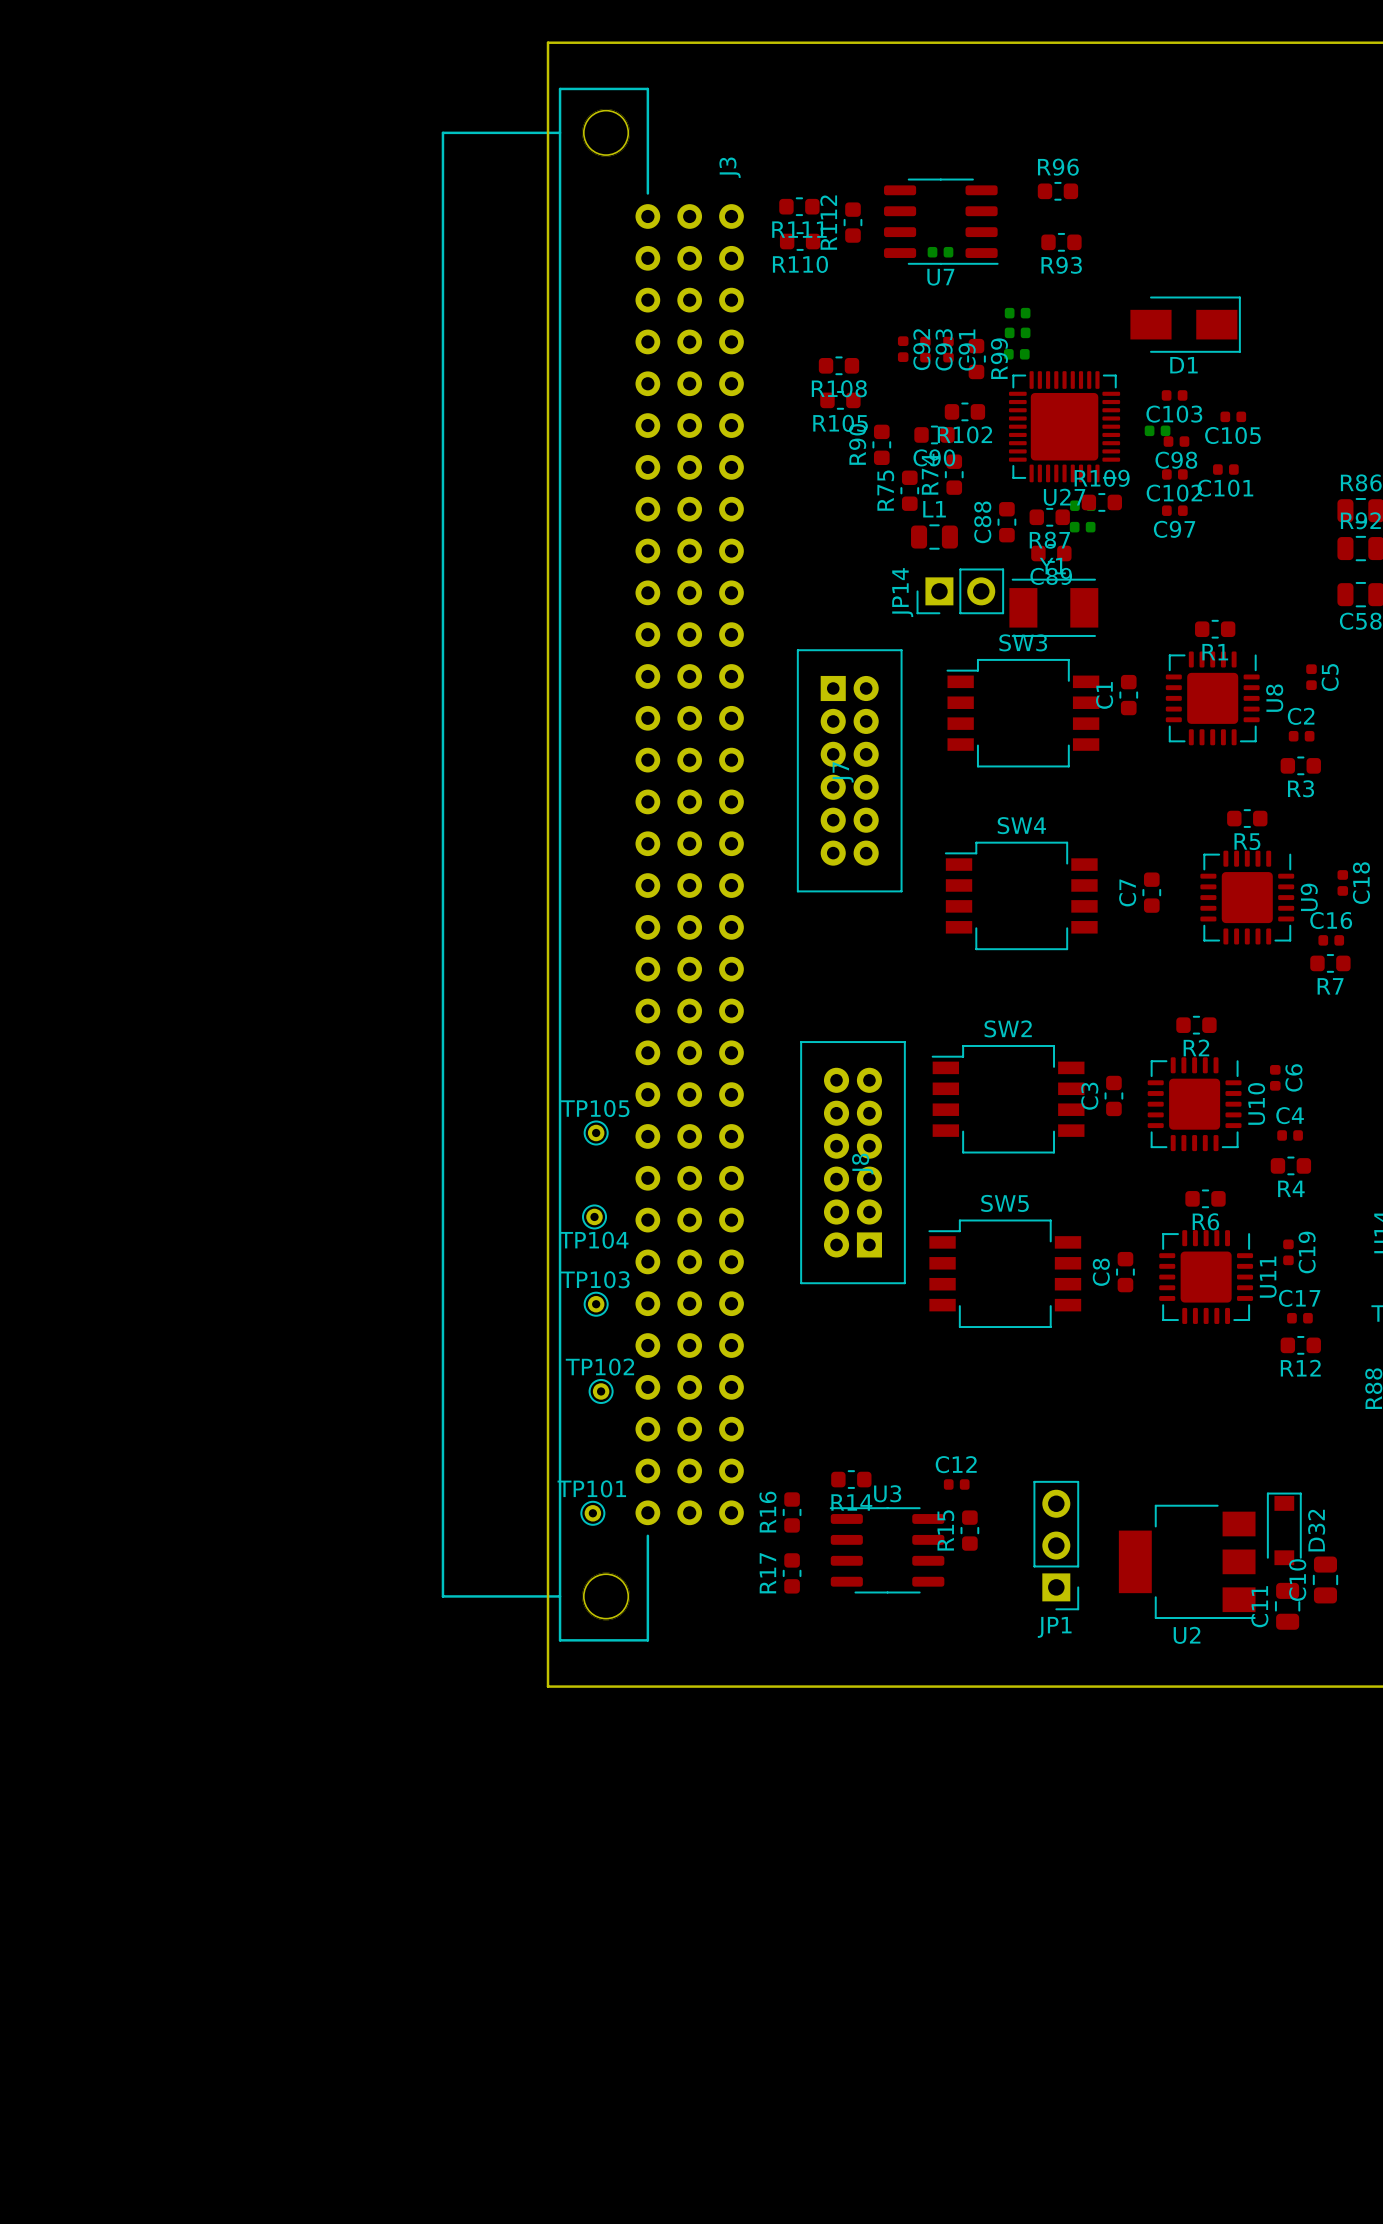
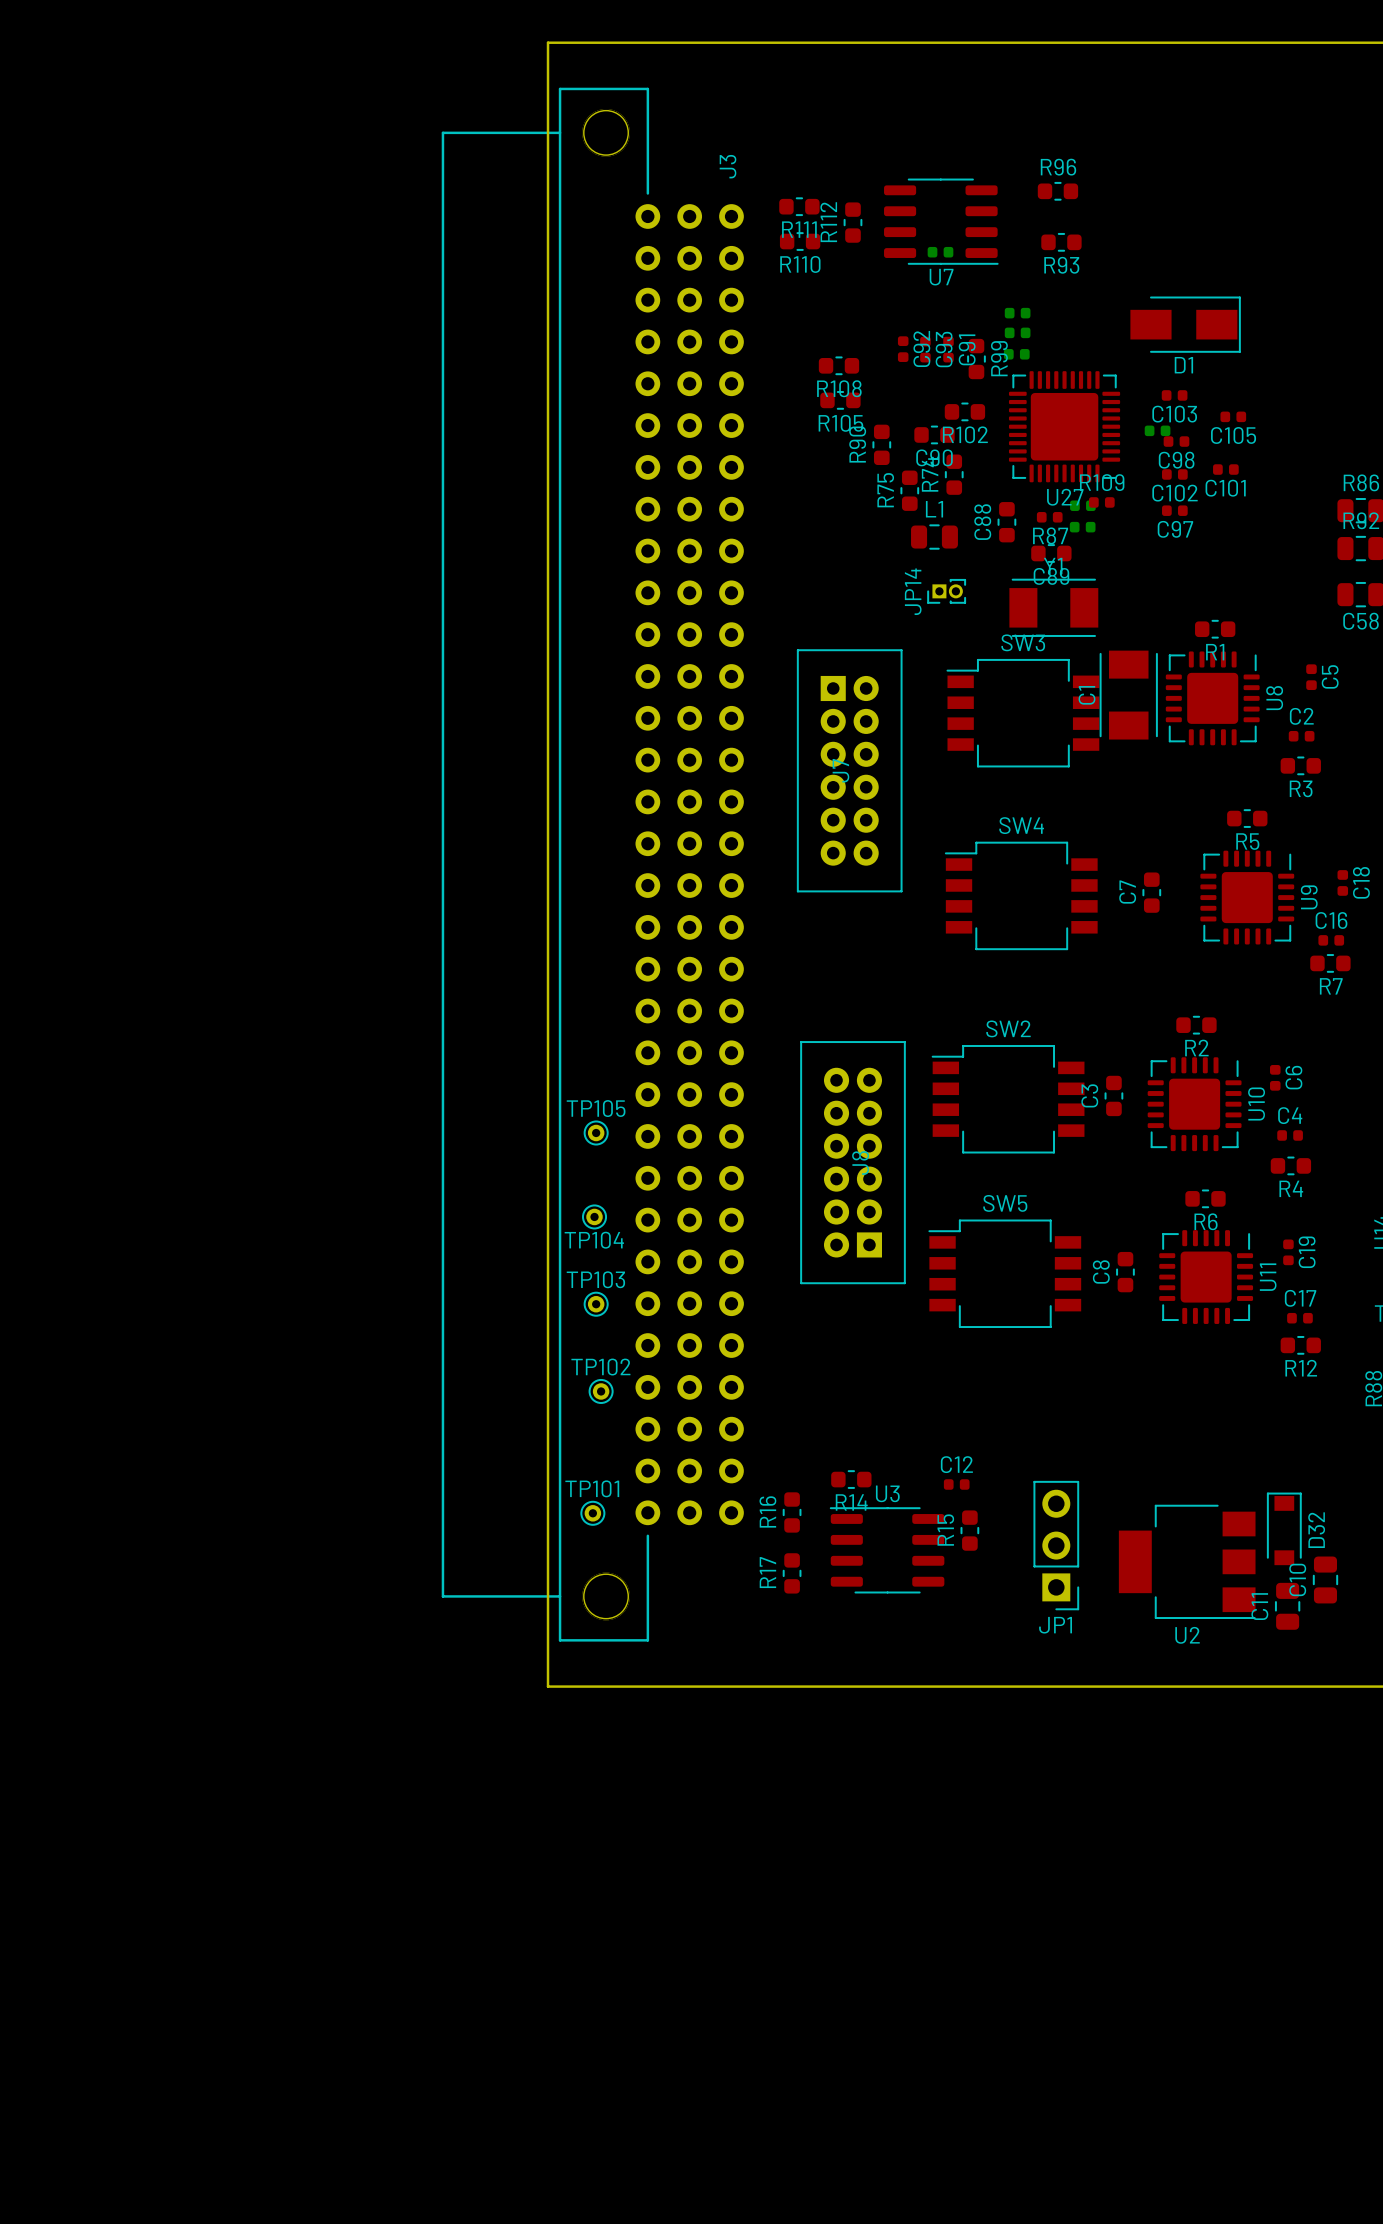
R109 footprint: [1081, 493, 1123, 512] -> [1088, 497, 1115, 508]
R87 footprint: [1029, 507, 1070, 527] -> [1036, 512, 1063, 523]
JP14 footprint: [916, 568, 1005, 615] -> [927, 578, 967, 604]
C1 footprint: [1119, 674, 1139, 716] -> [1099, 650, 1158, 740]

